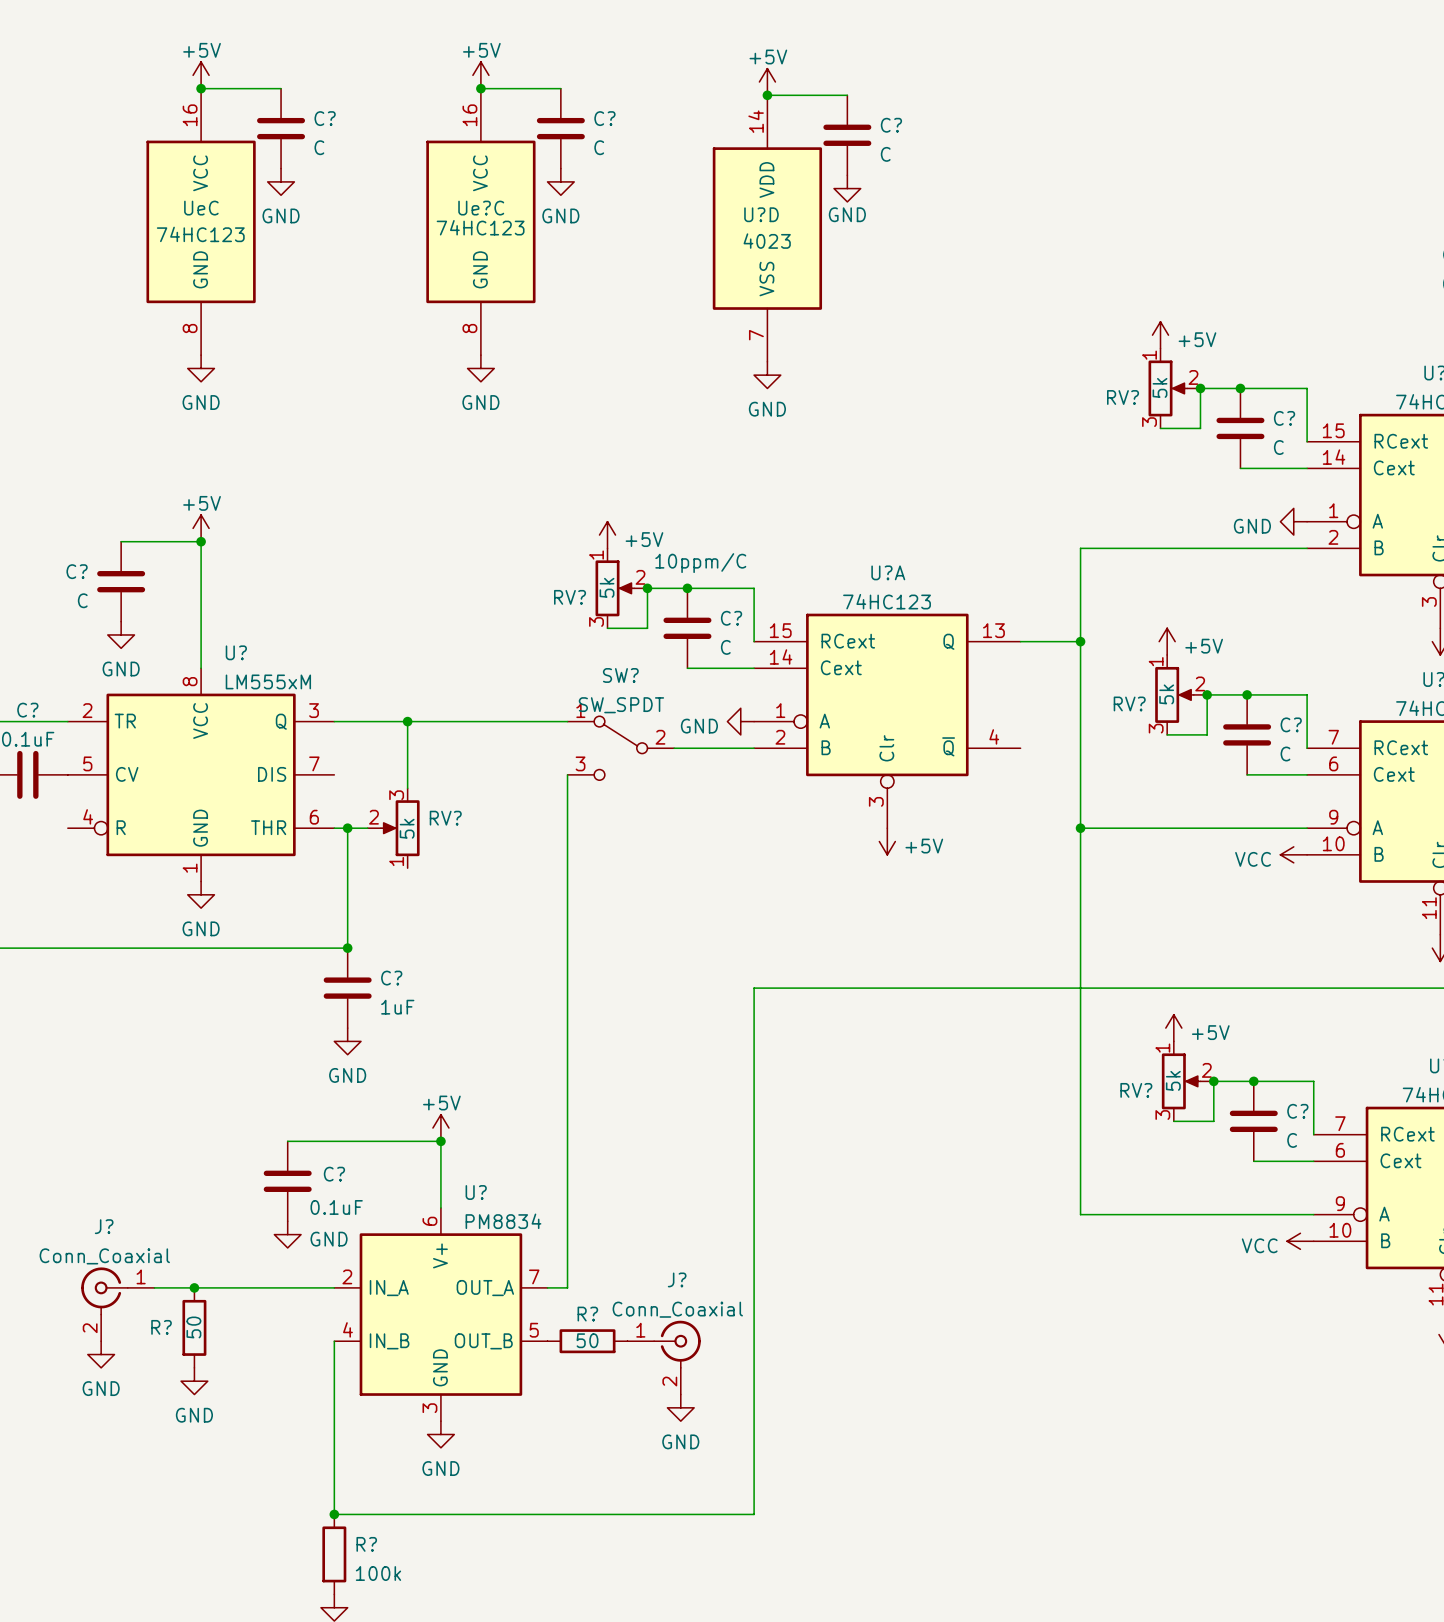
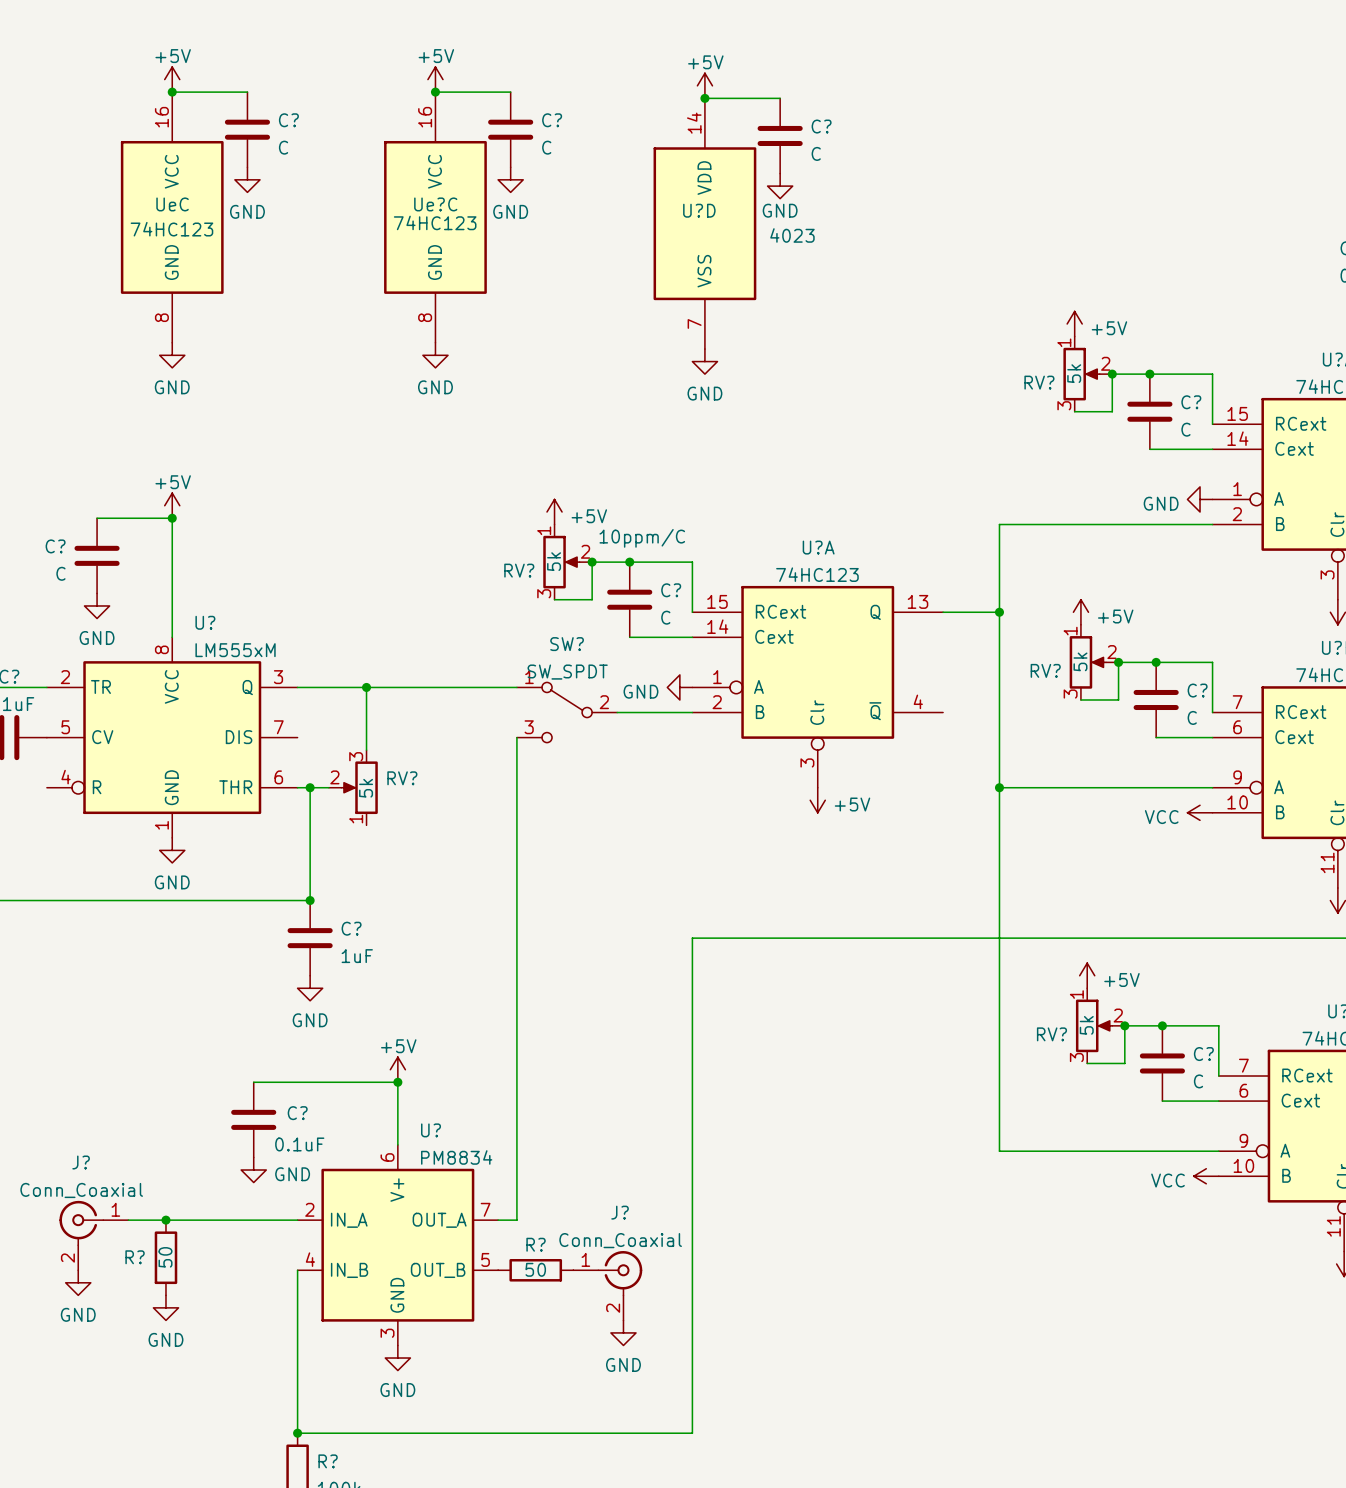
U?D value position: 4023 (767, 241) -> 4023 (792, 235)

